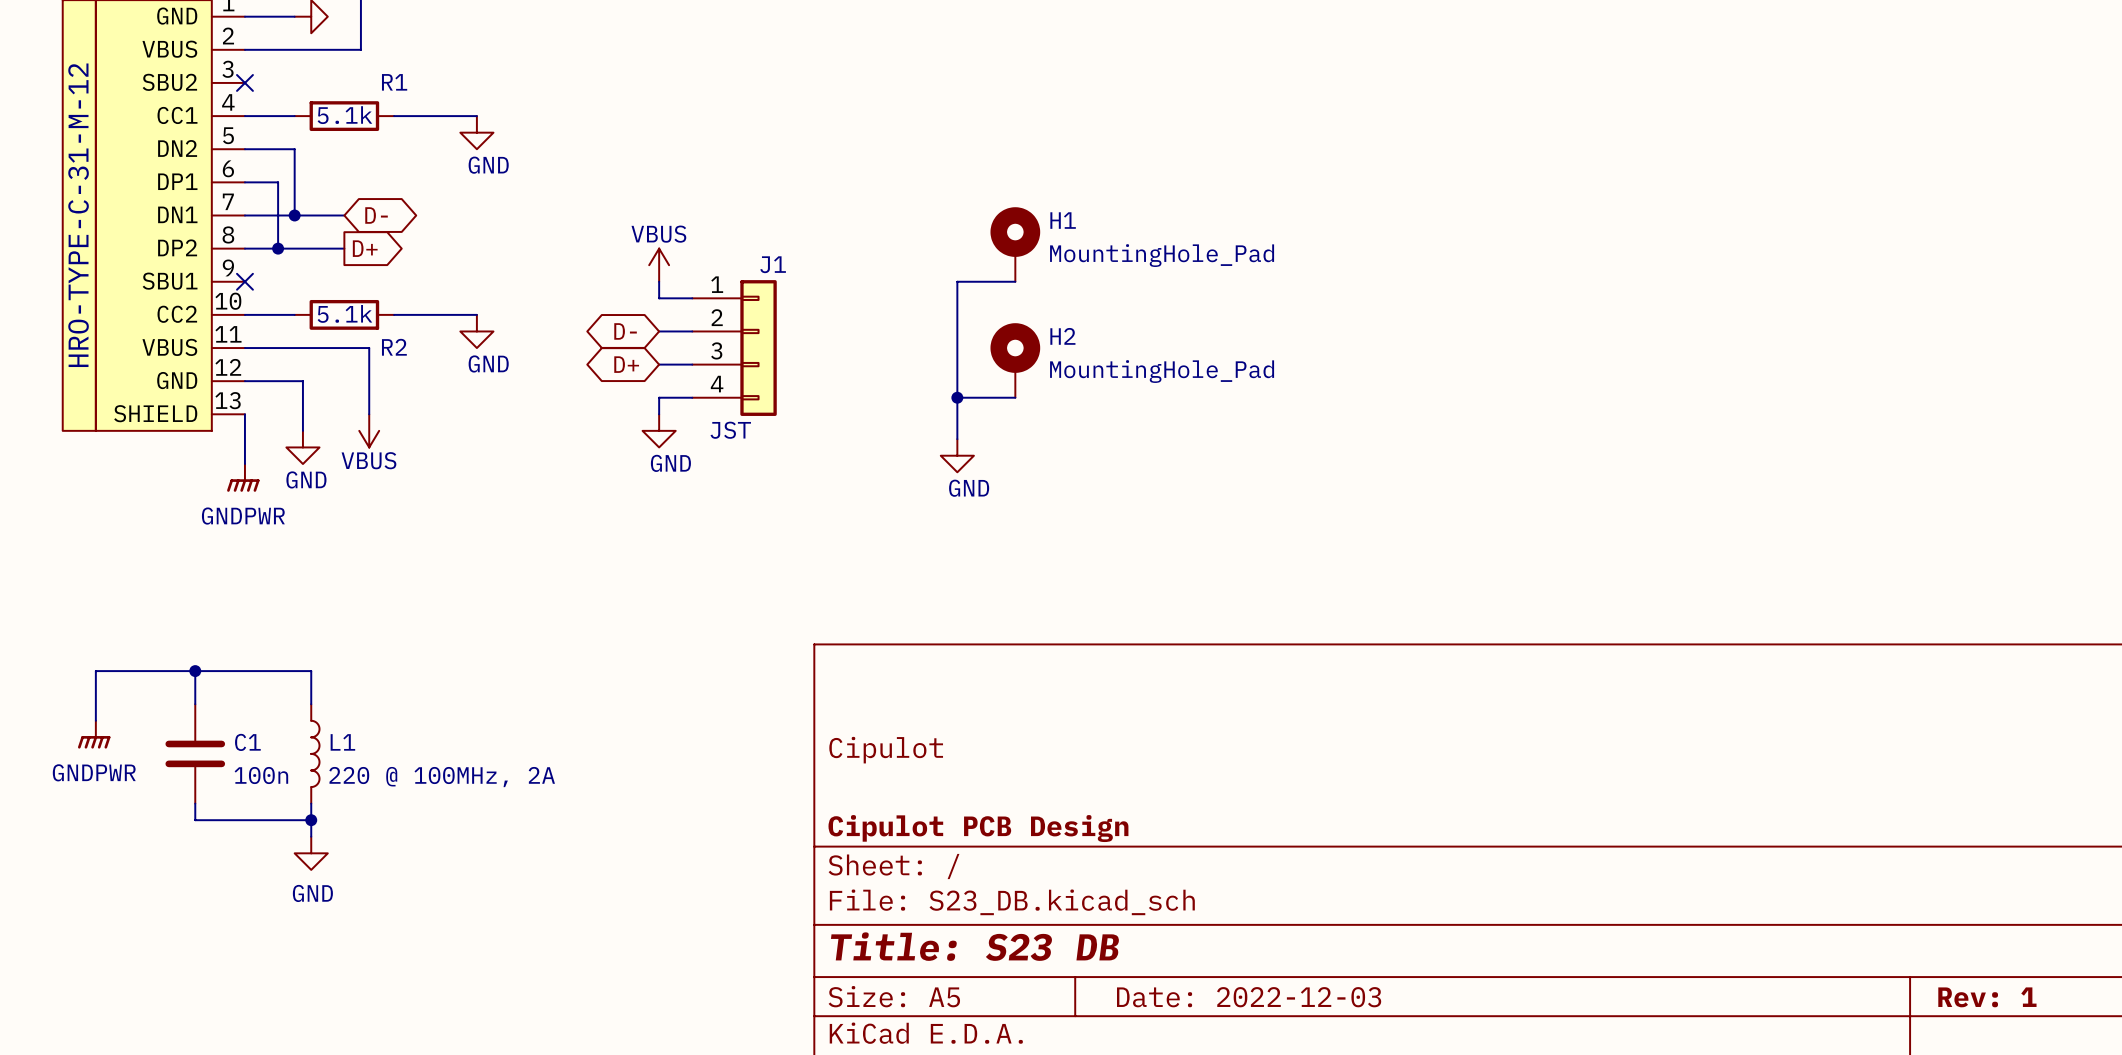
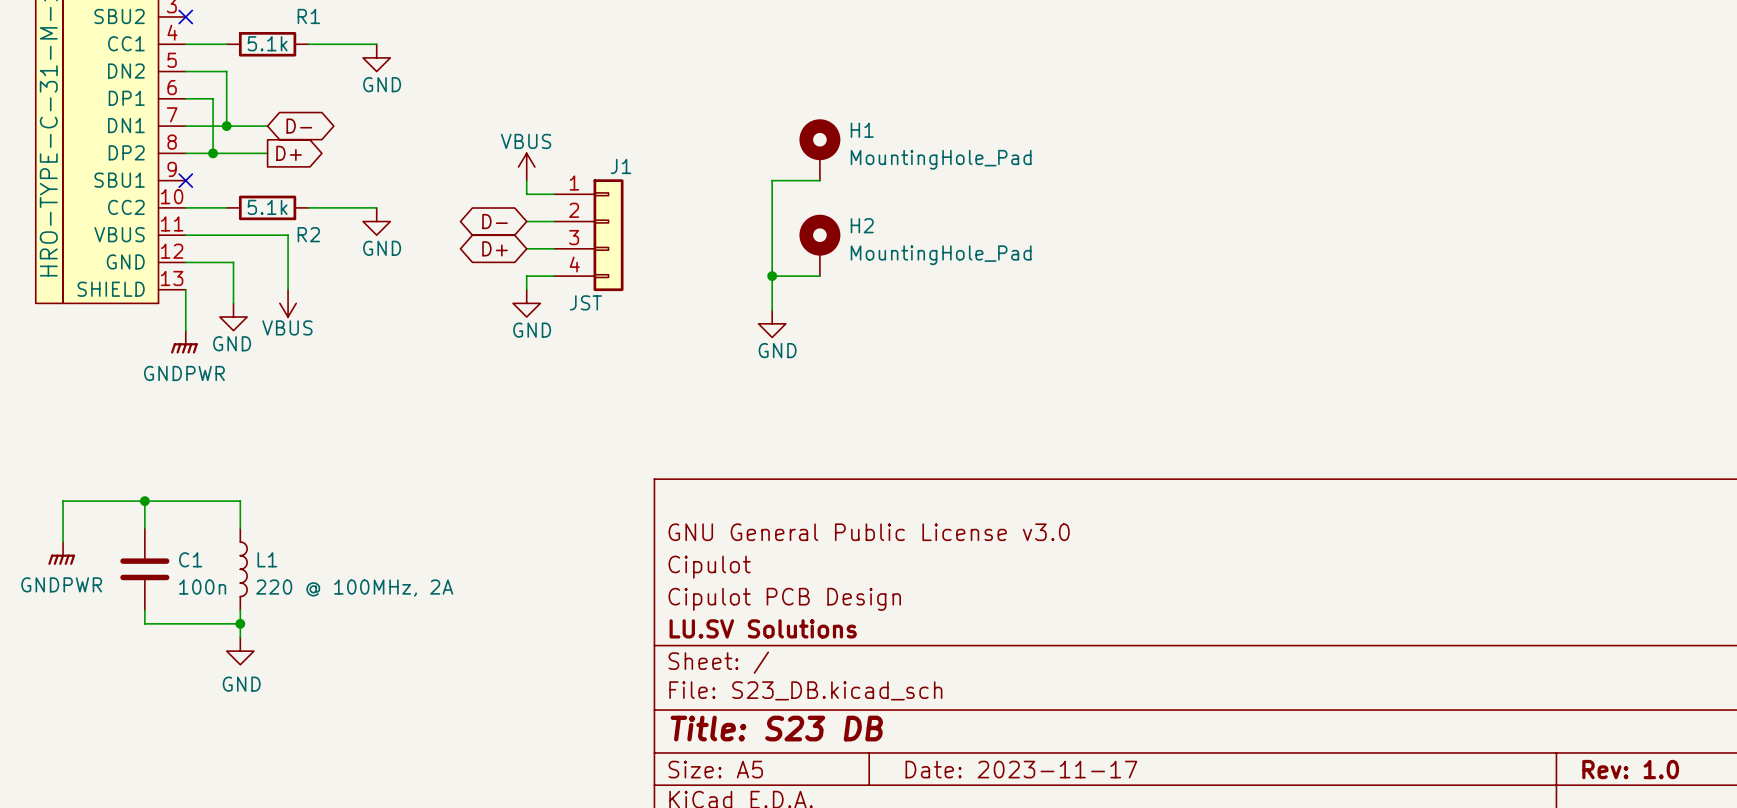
title block: none -> GNU General Public License v3.0 (869, 532)
title block: none -> Cipulot PCB Design (784, 599)
title block: Cipulot PCB Design (978, 828) -> LU.SV Solutions (763, 628)
title block: Date: 2022-12-03 (1249, 997) -> Date: 2023-11-17 (1021, 769)
title block: Rev: 1 (1987, 997) -> Rev: 1.0 (1630, 769)

